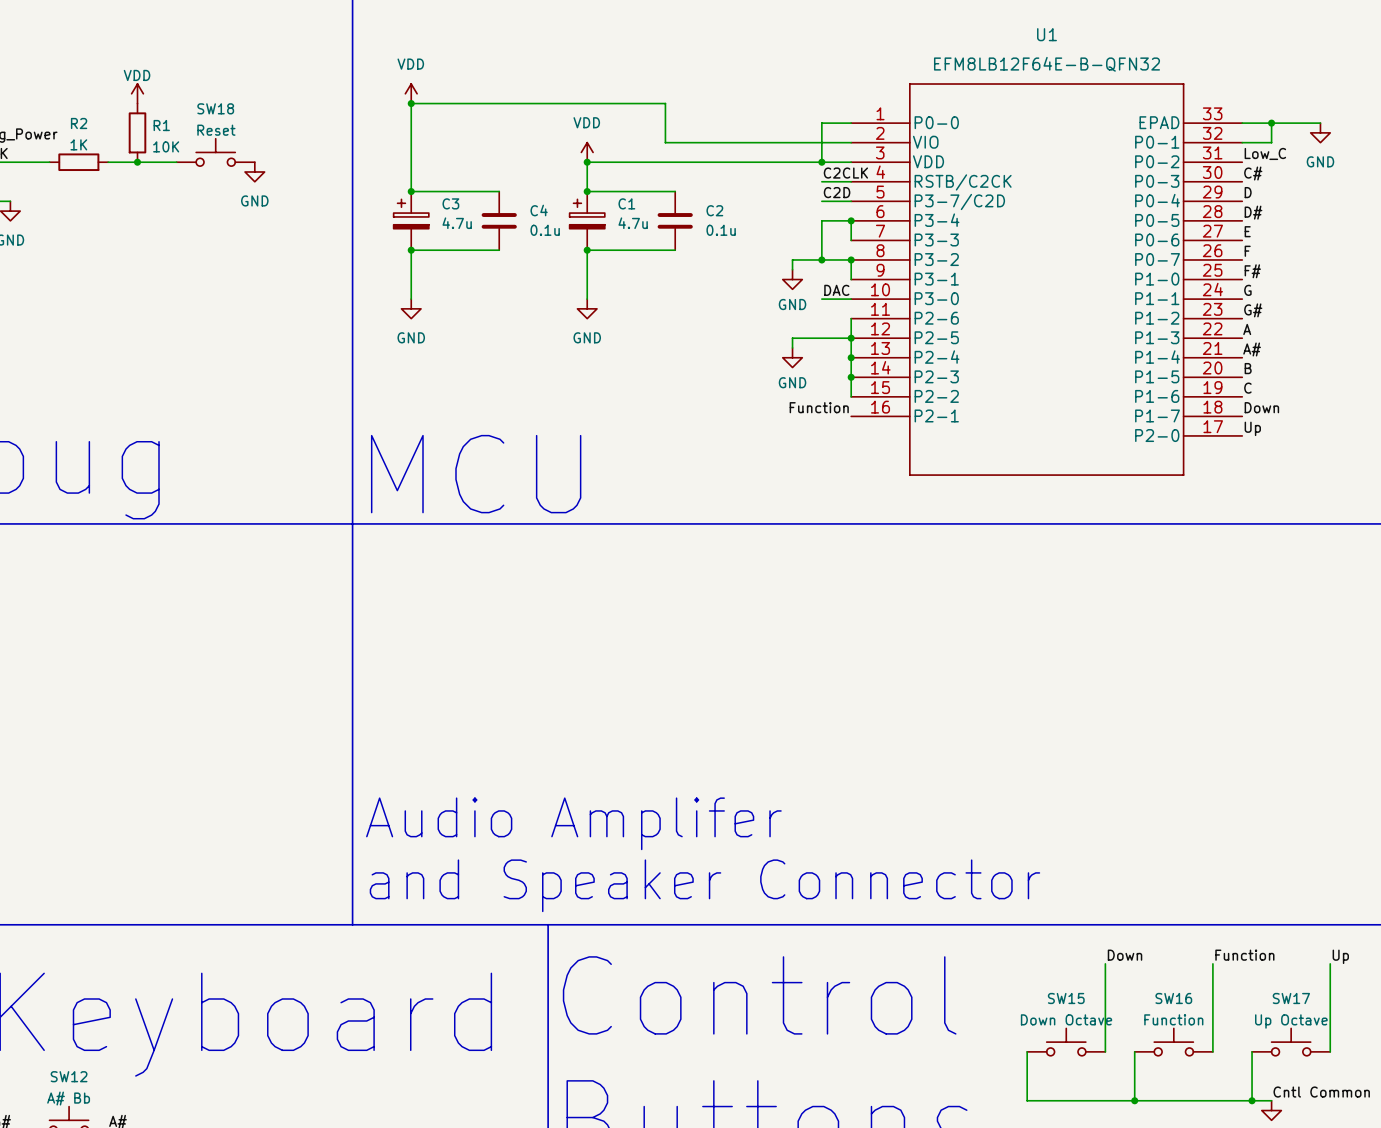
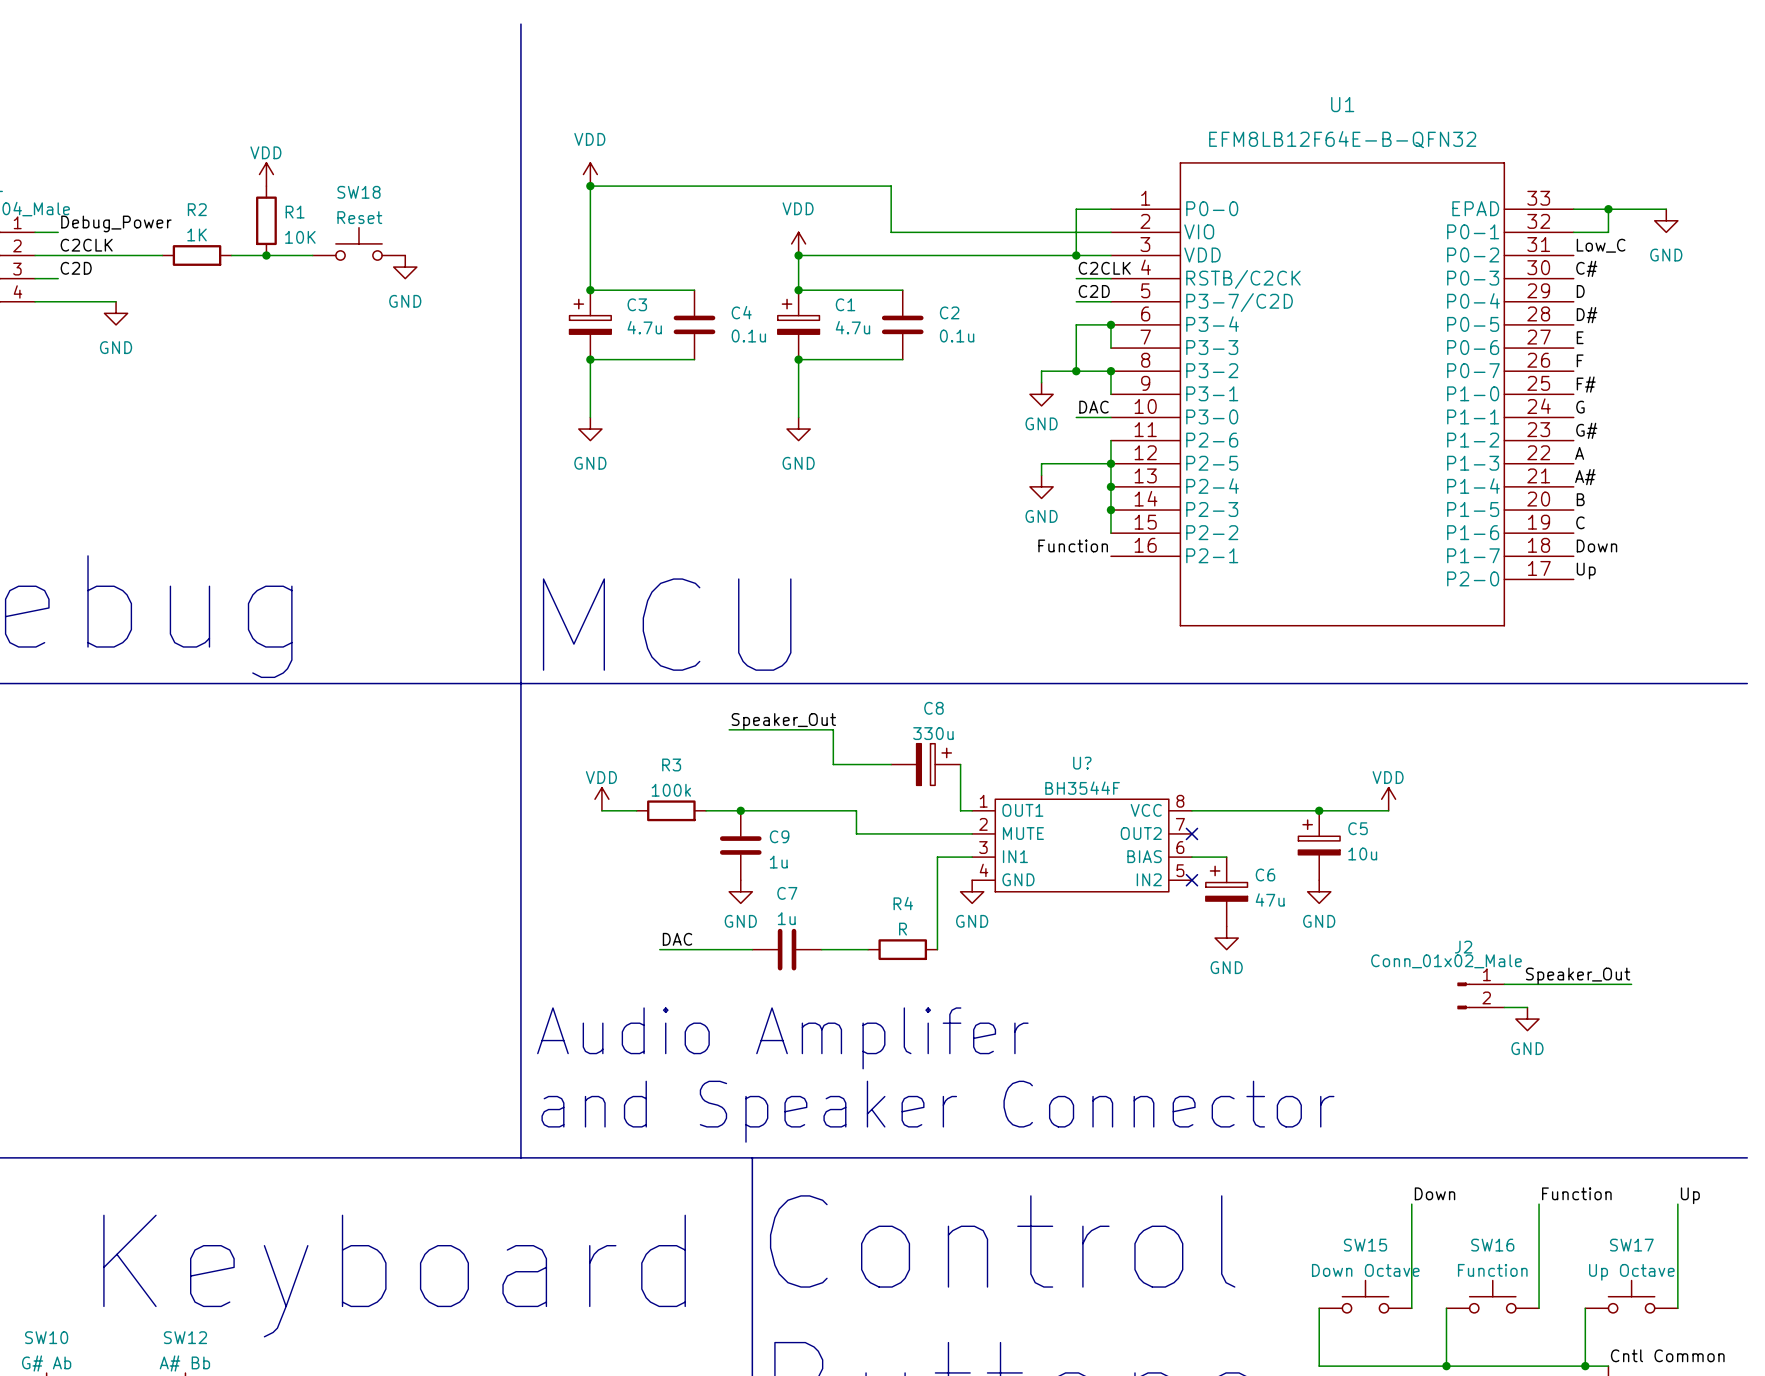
label: none -> Speaker_Out (783, 721)
wire: none -> (729, 729) (833, 729) (833, 764) (891, 764)
C8: none -> 330u (925, 764)
wire: none -> (960, 764) (960, 810) (972, 810)
power symbol: none -> VDD (601, 799)
power symbol: none -> VDD (1388, 799)
wire: none -> (601, 810) (636, 810)
R3: none -> 100k (671, 810)
wire: none -> (706, 810) (856, 810) (856, 833) (972, 833)
junction: none -> (740, 810)
wire: none -> (1191, 810) (1388, 810)
junction: none -> (1319, 810)
no-connect mark: none -> (1191, 833)
C9: none -> 1u (740, 845)
U?: none -> BH3544F (1082, 845)
C5: none -> 10u (1319, 845)
wire: none -> (972, 857) (937, 857) (937, 949)
wire: none -> (1191, 857) (1226, 857)
no-connect mark: none -> (1191, 880)
power symbol: none -> GND (740, 891)
power symbol: none -> GND (972, 891)
C6: none -> 47u (1226, 891)
power symbol: none -> GND (1319, 891)
power symbol: none -> GND (1226, 938)
label: none -> DAC (677, 939)
wire: none -> (659, 949) (752, 949)
C7: none -> 1u (787, 949)
wire: none -> (821, 949) (868, 949)
R4: none -> R (902, 949)
label: none -> Speaker_Out (1578, 975)
wire: none -> (1504, 984) (1631, 984)
J2: none -> Conn_01x02_Male (1480, 995)
wire: none -> (1504, 1007) (1527, 1007)
power symbol: none -> GND (1527, 1019)

